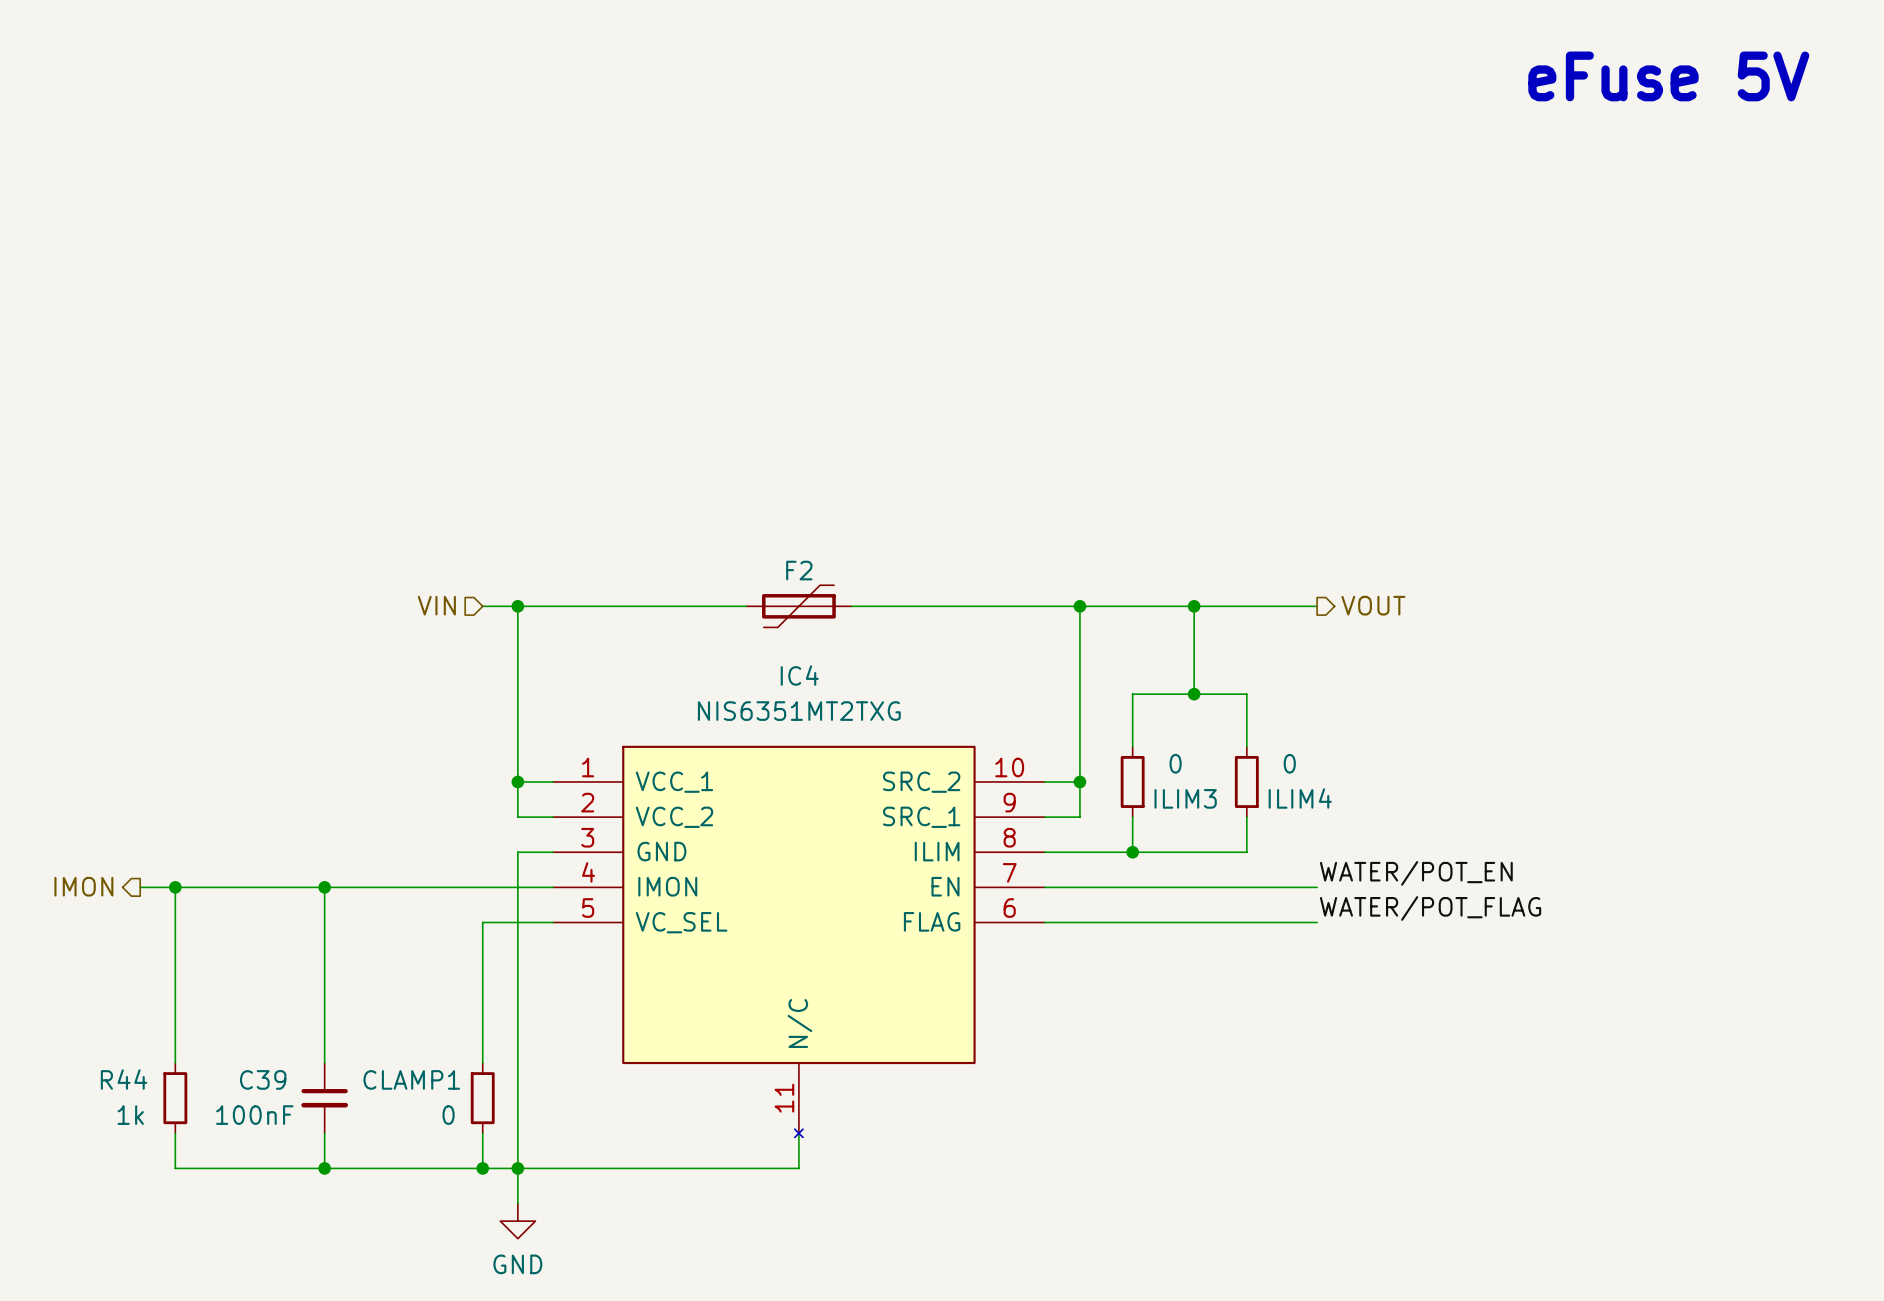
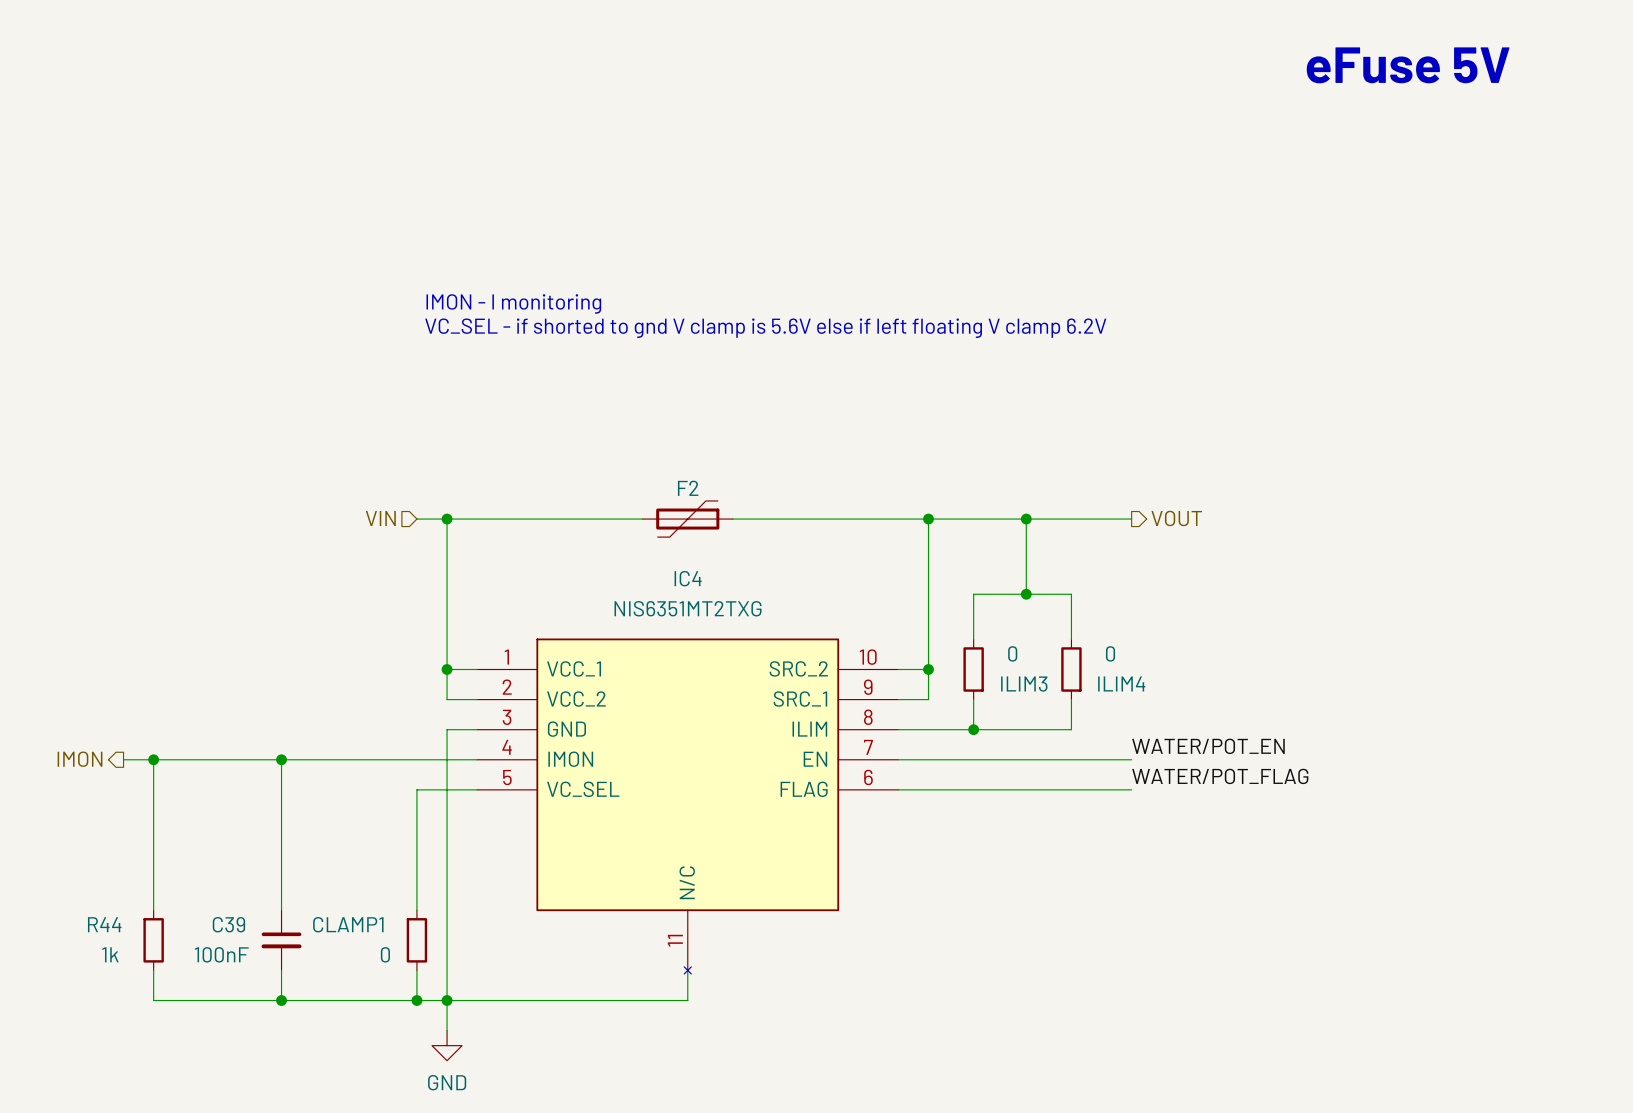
text: none -> IMON - I monitoring (513, 303)
text: none -> VC_SEL - if shorted to gnd V clamp is 5.6V else if left floating V clamp 6.2V (765, 328)

